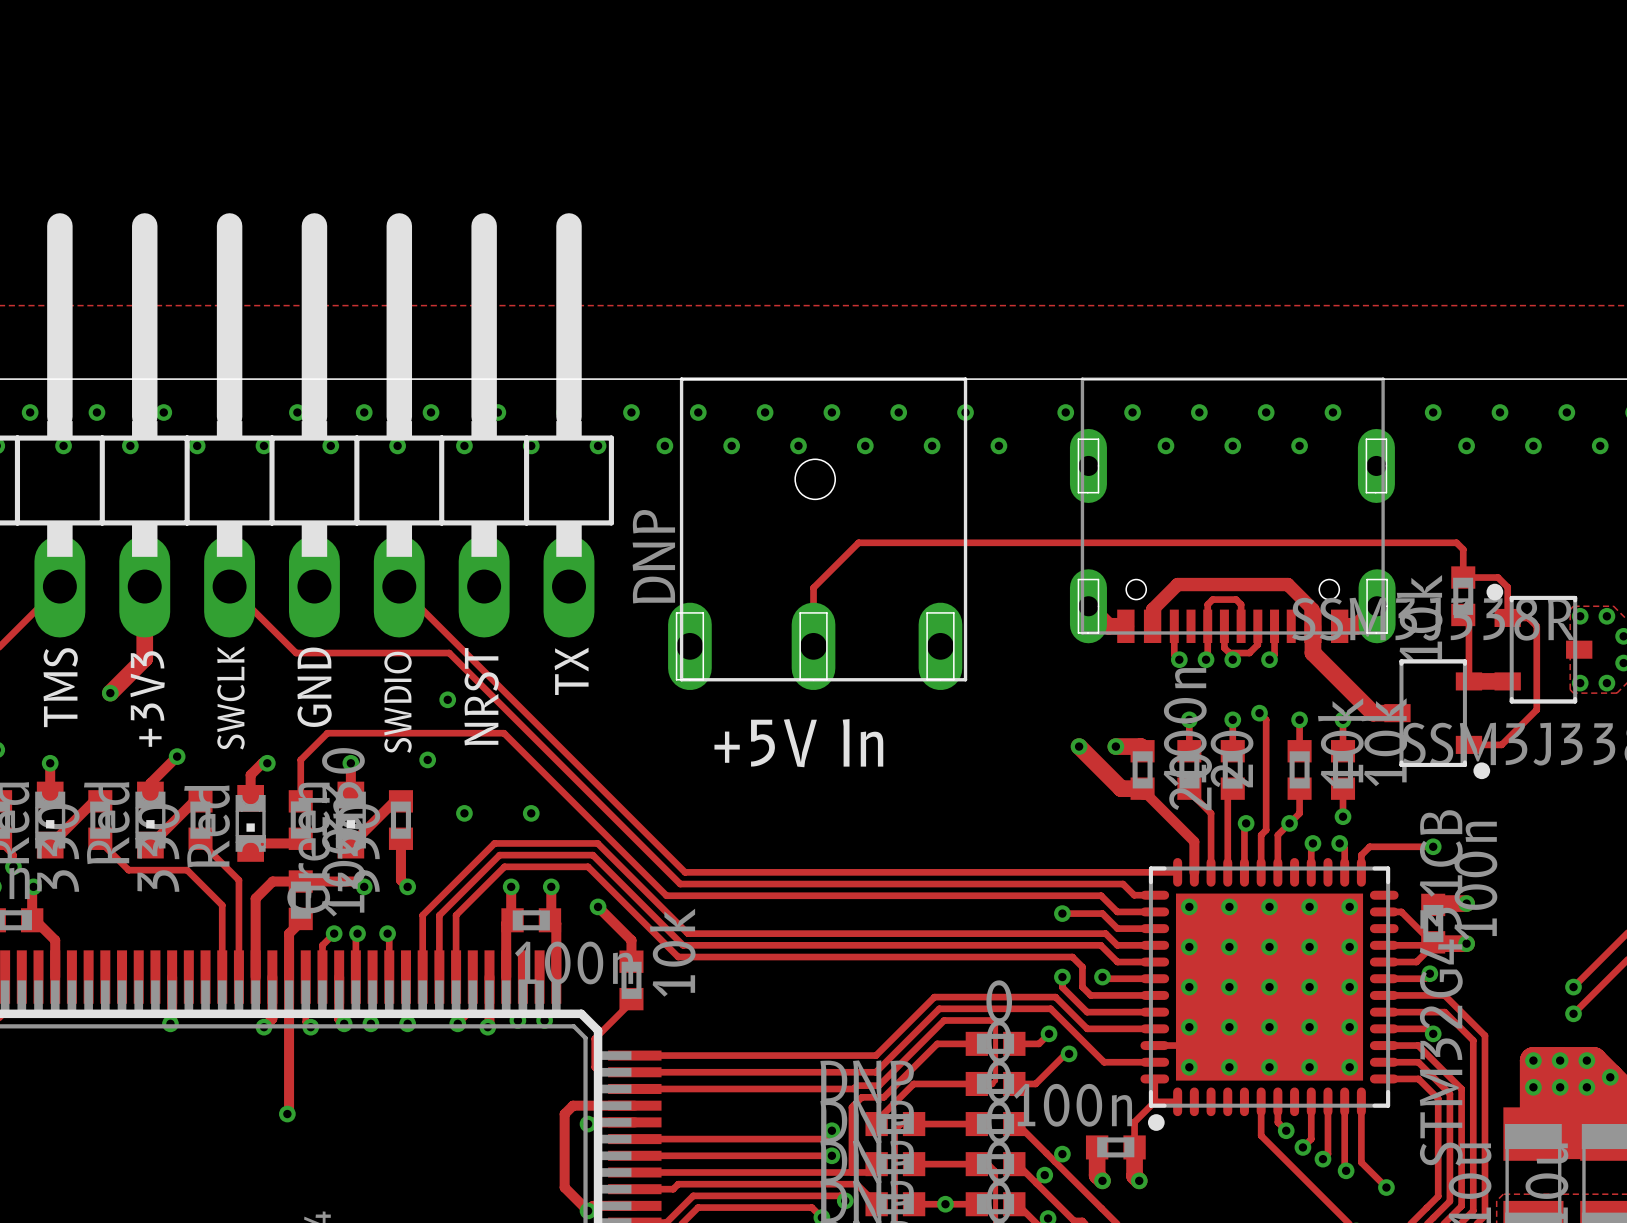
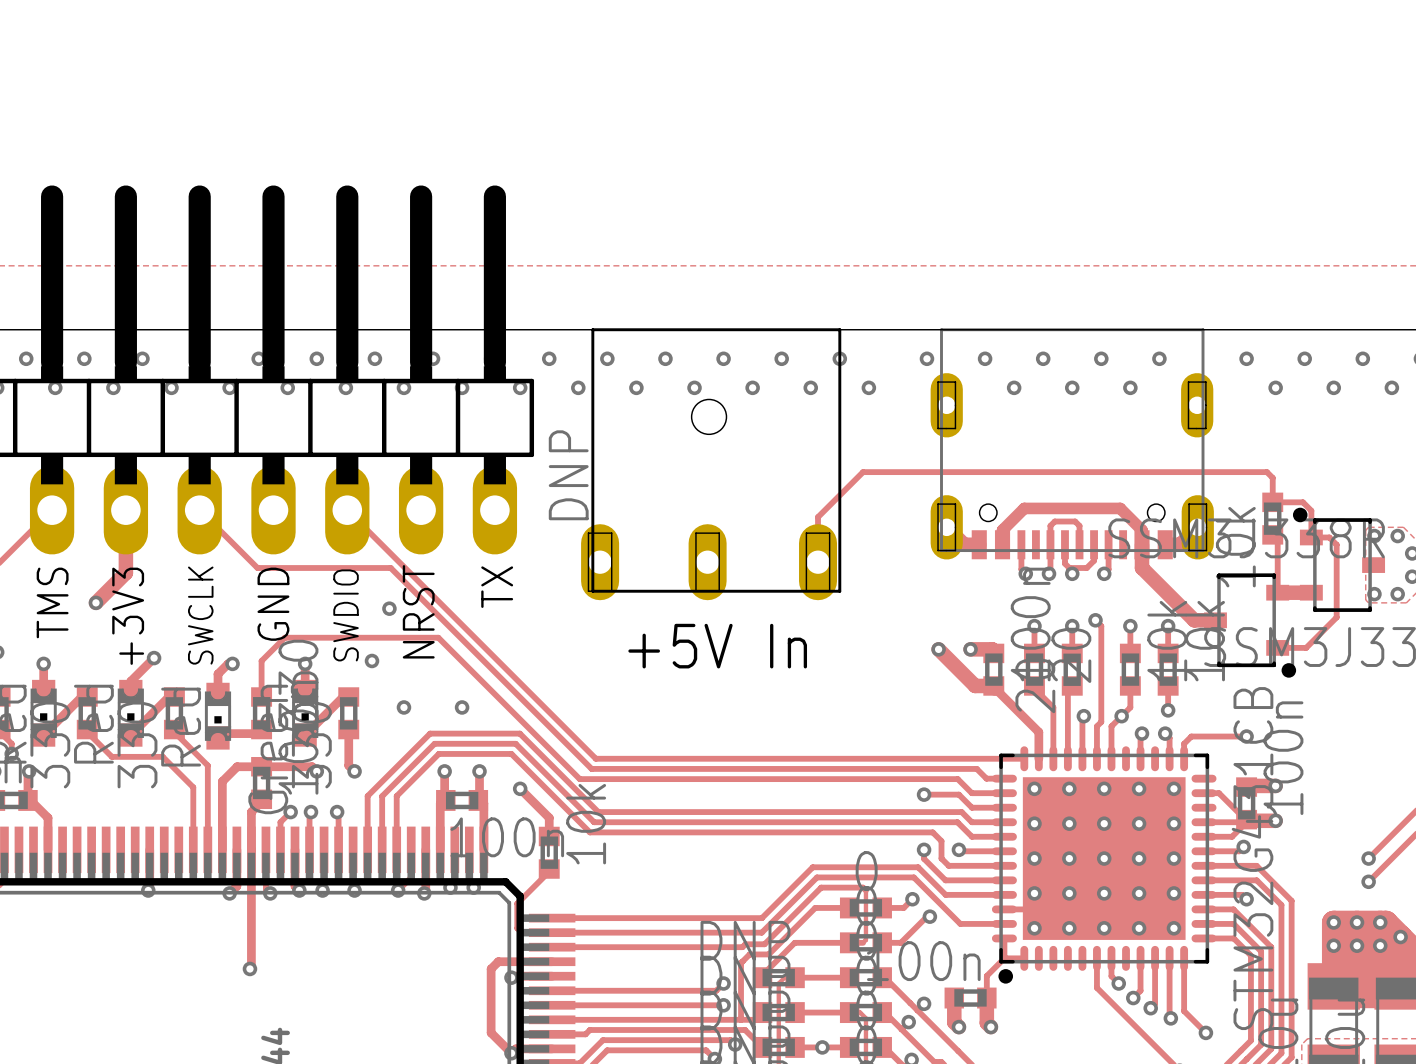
track: (992, 542) (858, 542) (813, 587) (813, 646) -> (863, 472) (818, 517) (818, 562)

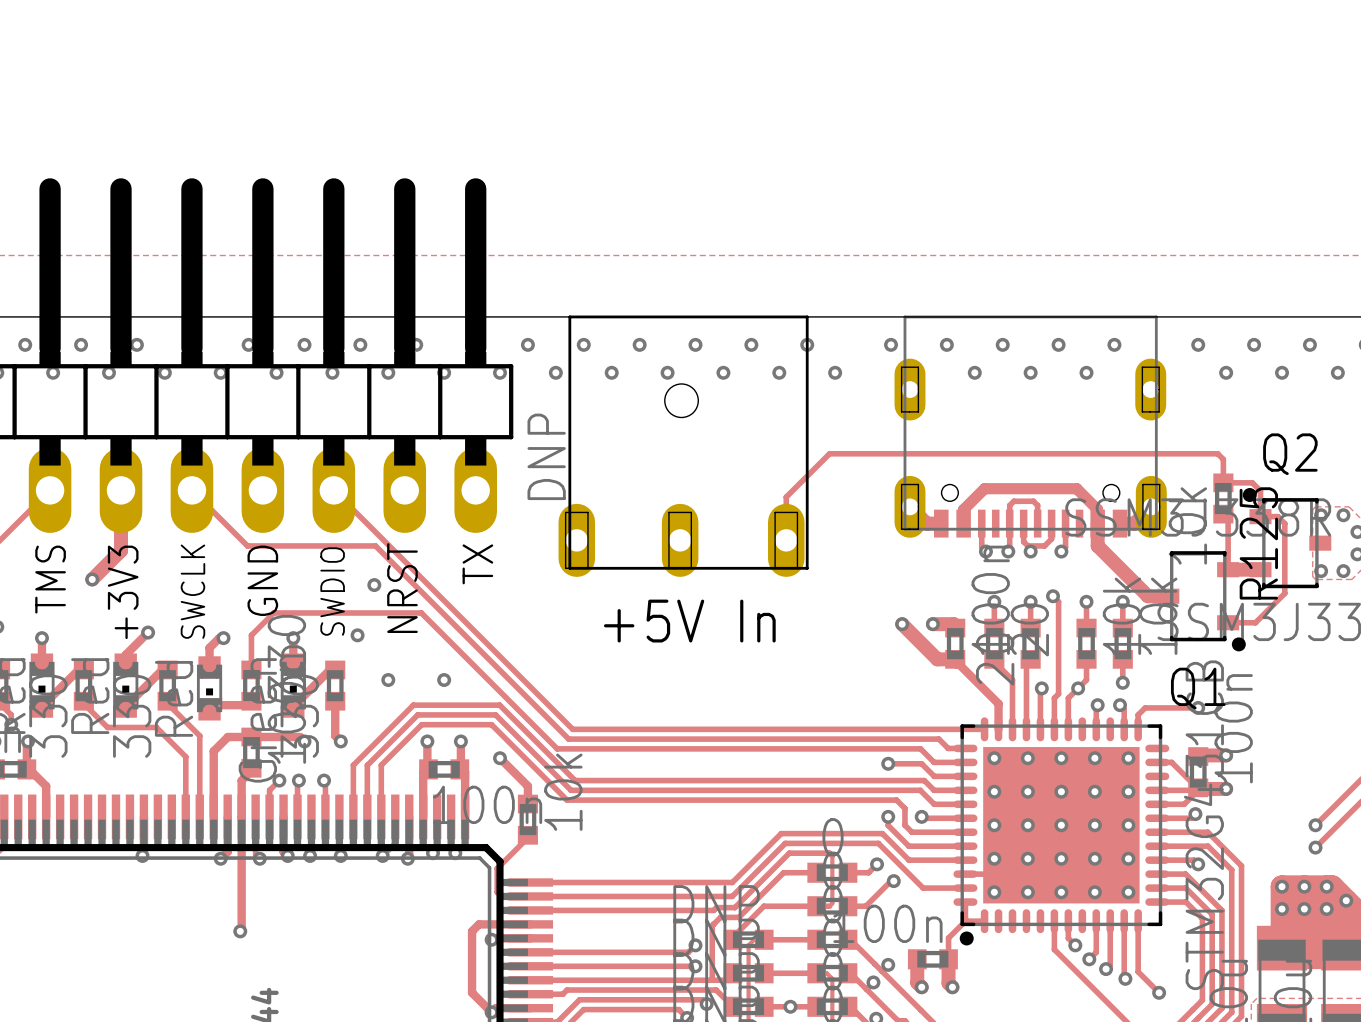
Q2 name: none -> Q2 (1290, 454)
R125 name: none -> R125 (1258, 543)
Q1 name: none -> Q1 (1198, 688)

